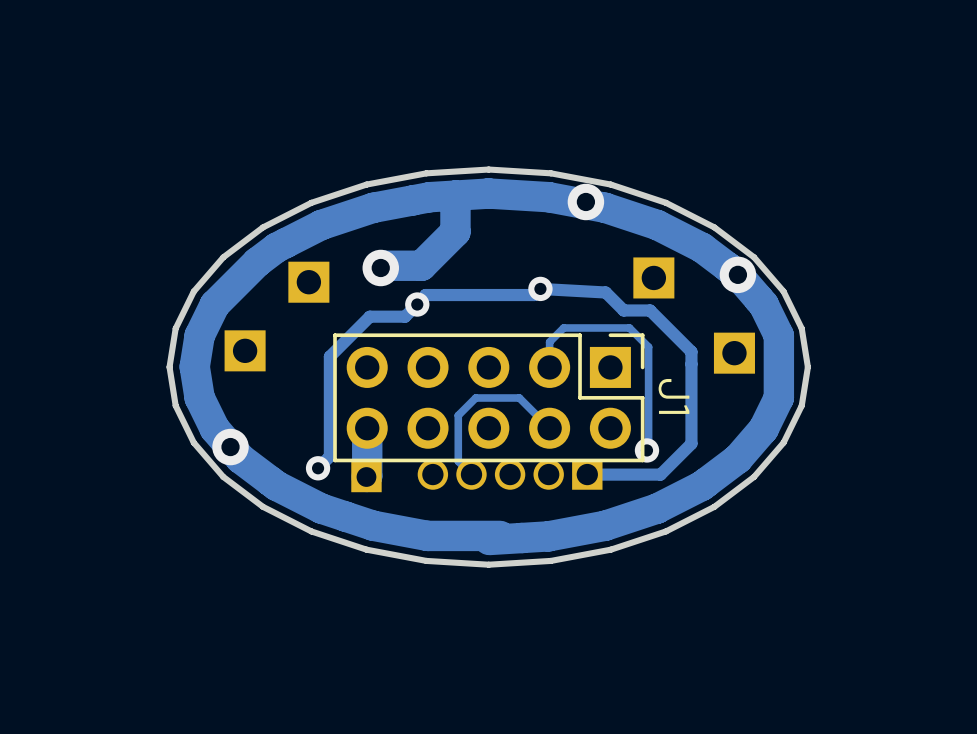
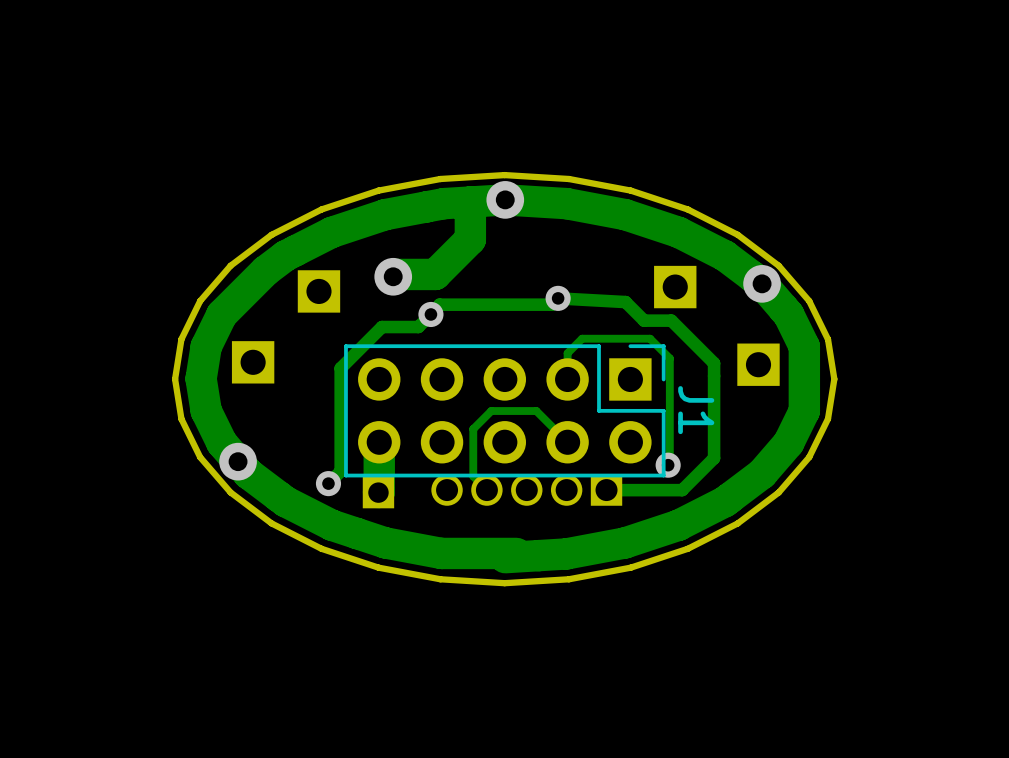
via position: (585, 201) -> (505, 199)

